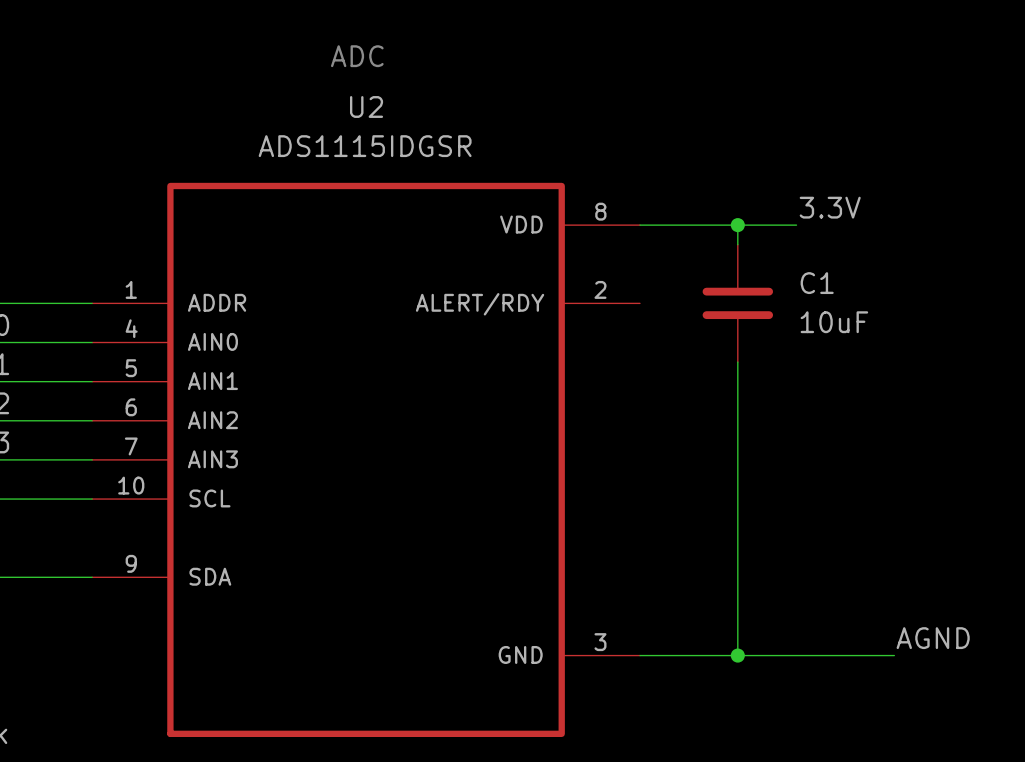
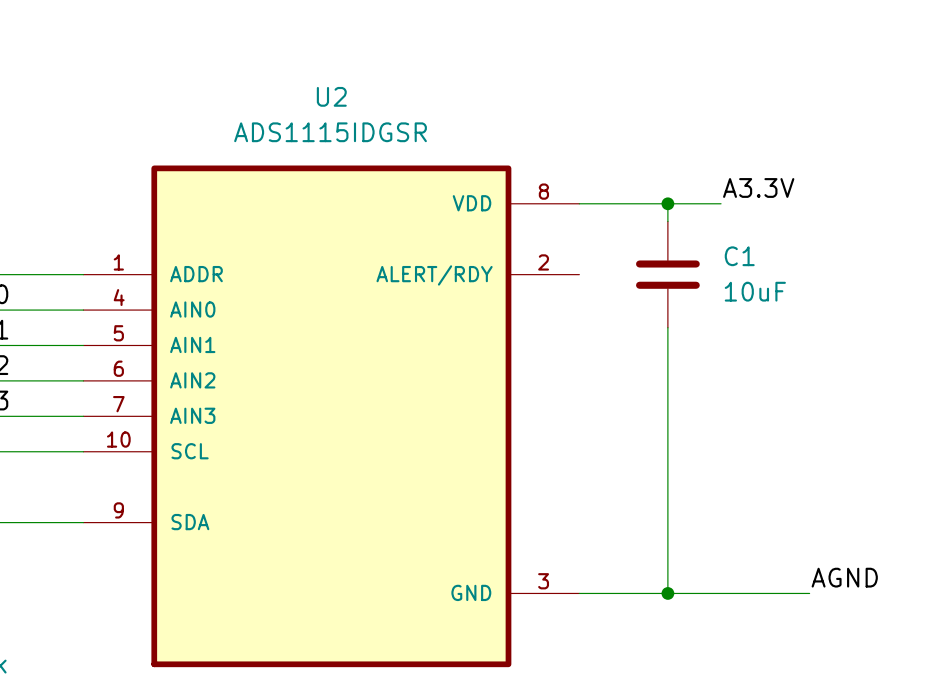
text: ADC (357, 56) -> none
label: 3.3V (830, 207) -> A3.3V (758, 187)

